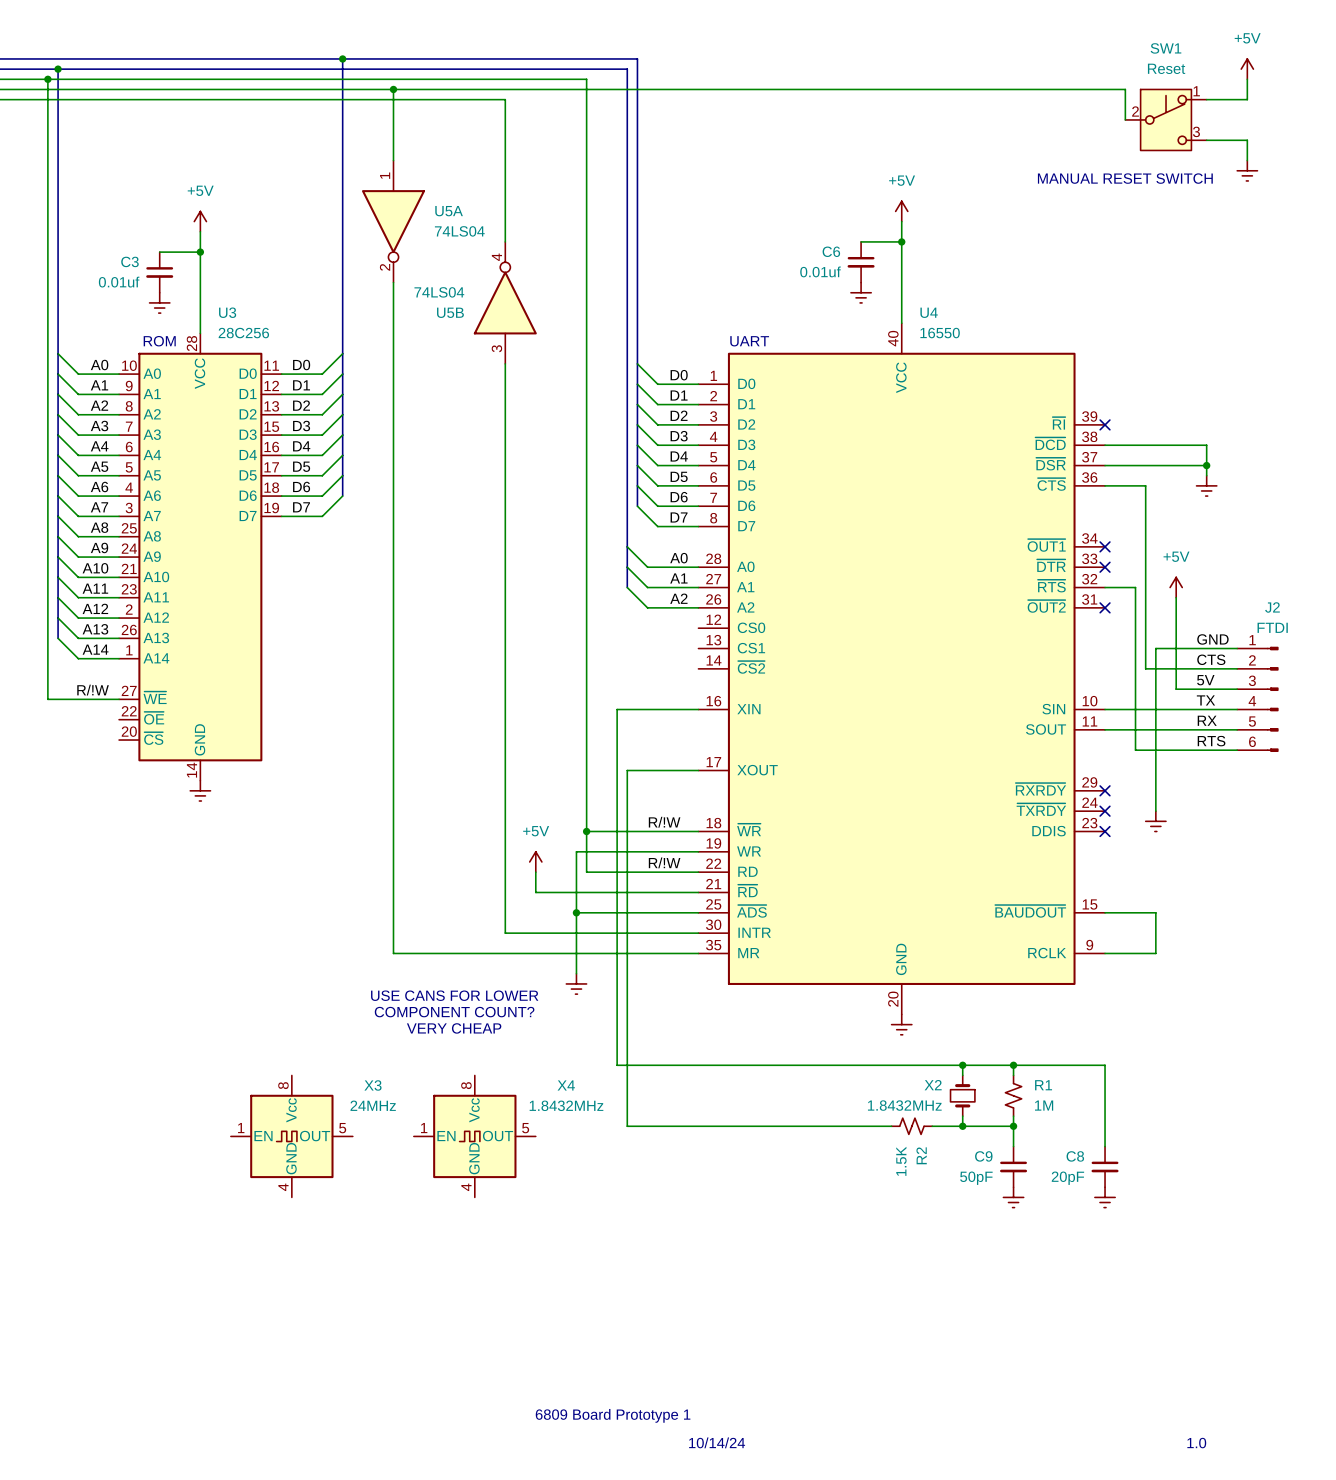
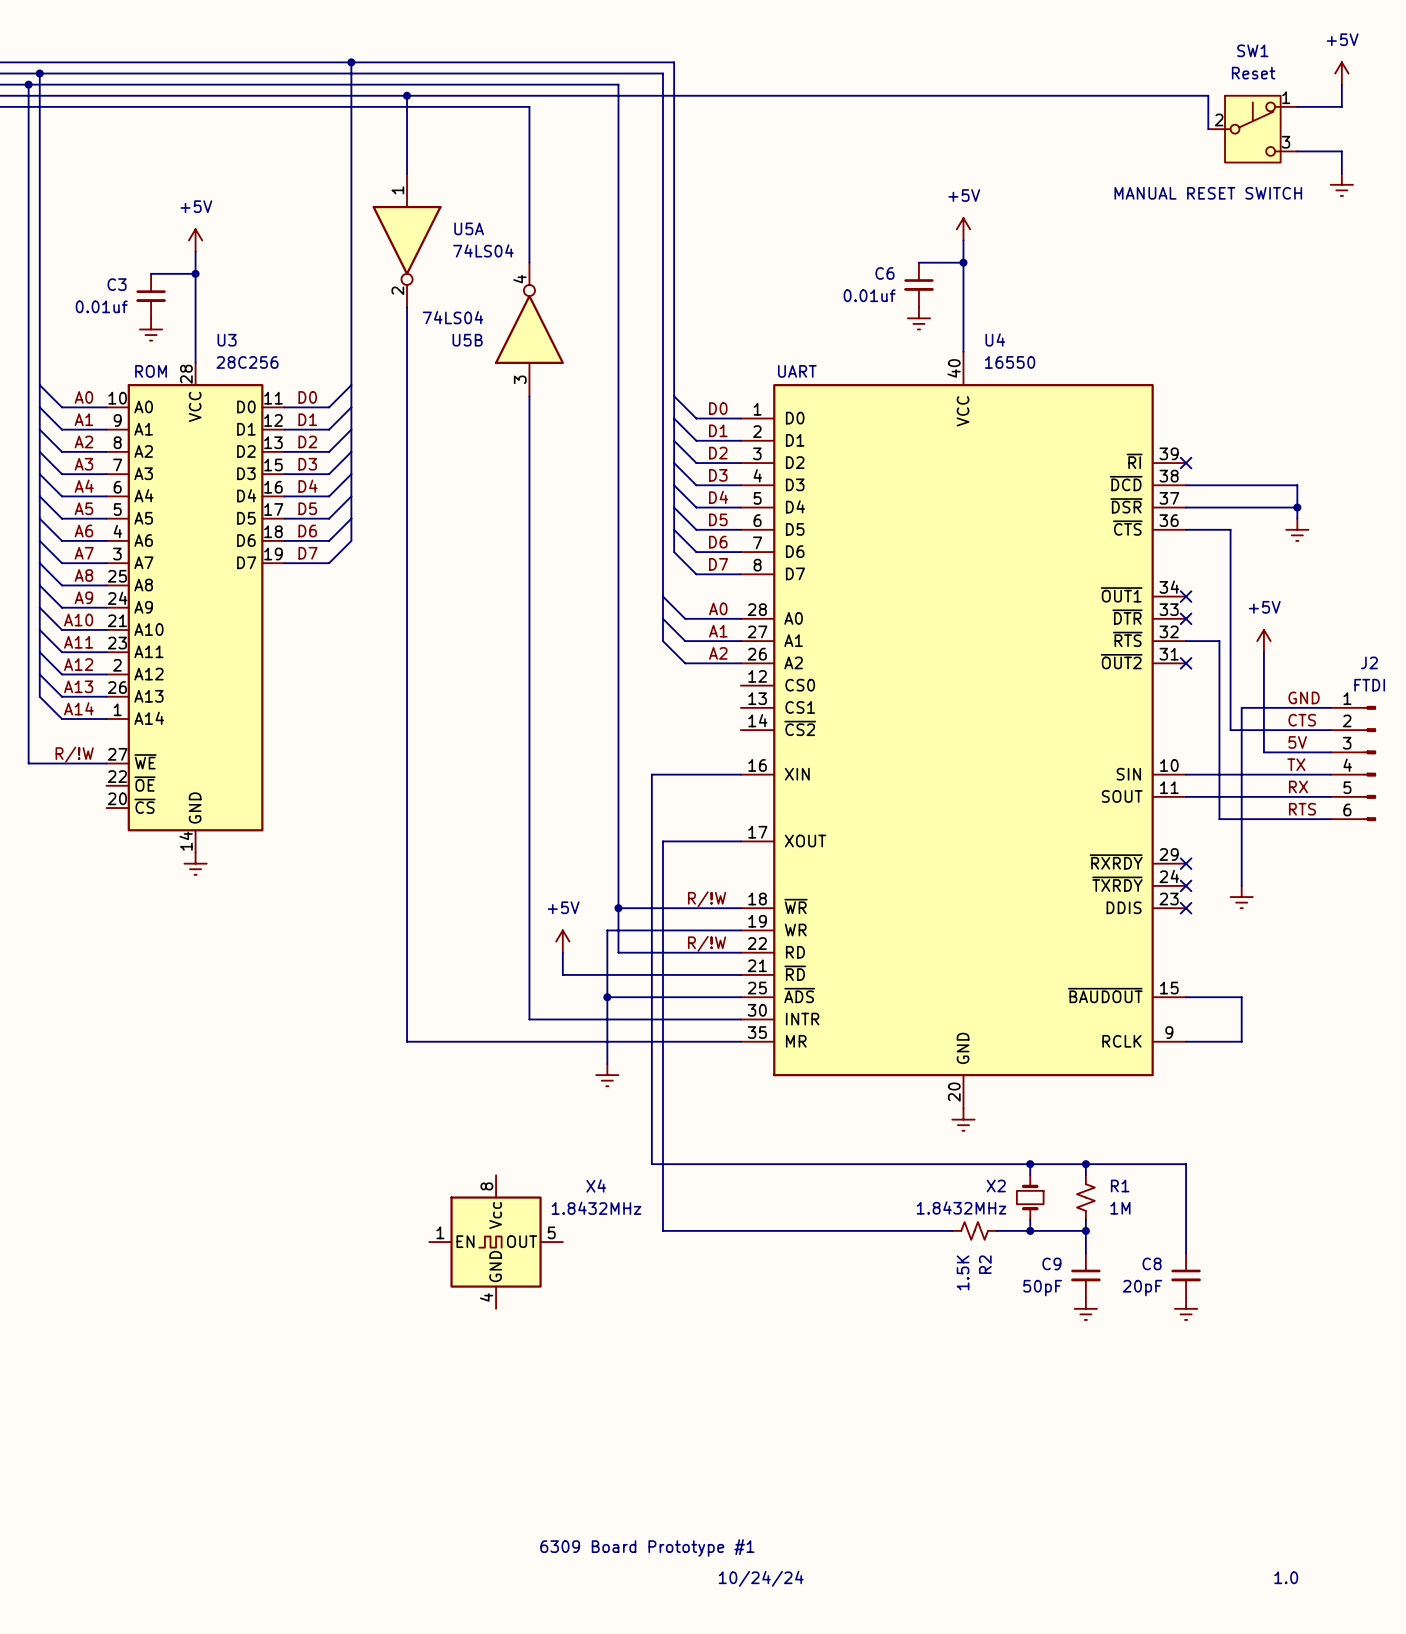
text: USE CANS FOR LOWER (454, 995) -> none
text: COMPONENT COUNT? (454, 1012) -> none
text: VERY CHEAP (454, 1028) -> none
X3: 24MHz (291, 1136) -> none
text: 6809 Board Prototype 1 (613, 1415) -> 6309 Board Prototype #1 (647, 1547)
text: 10/14/24 (717, 1442) -> 10/24/24 (761, 1578)

